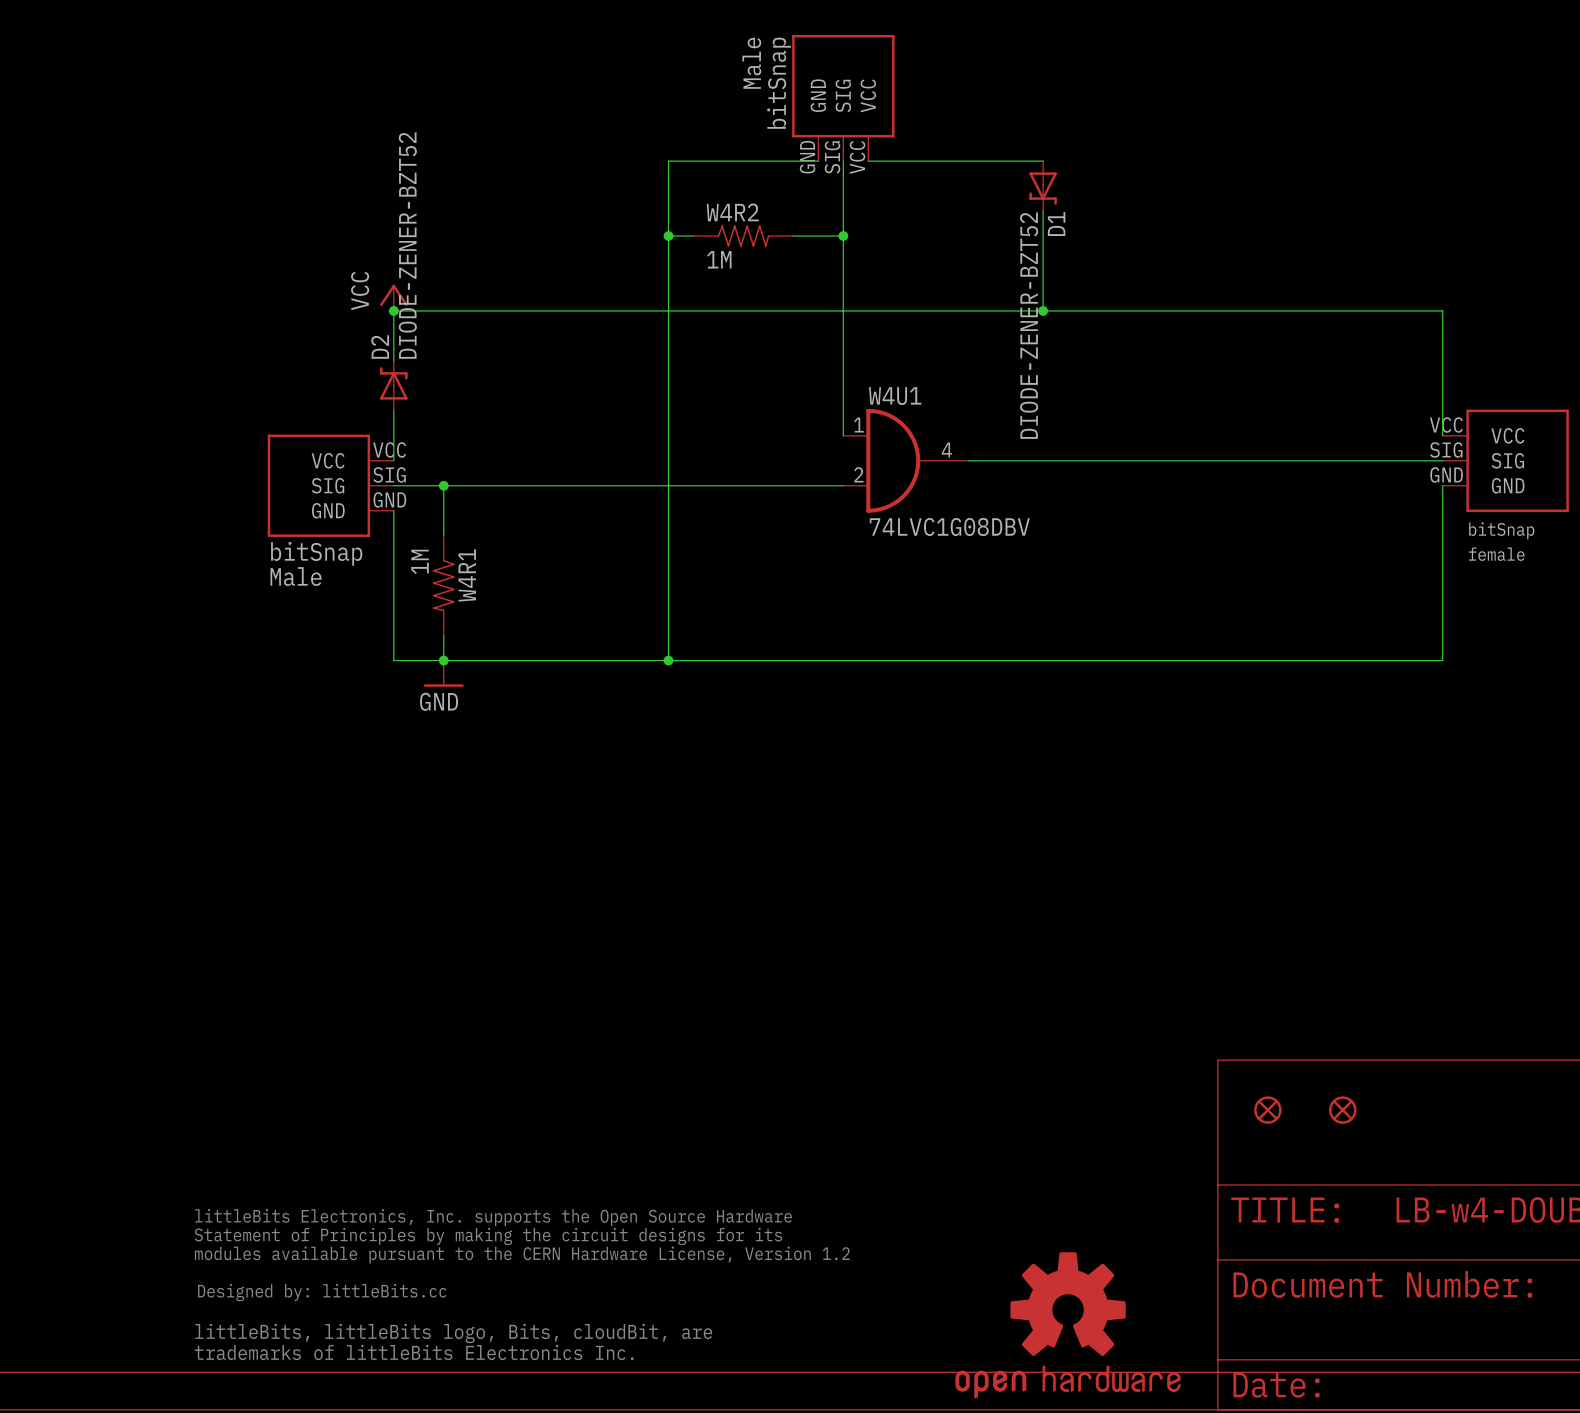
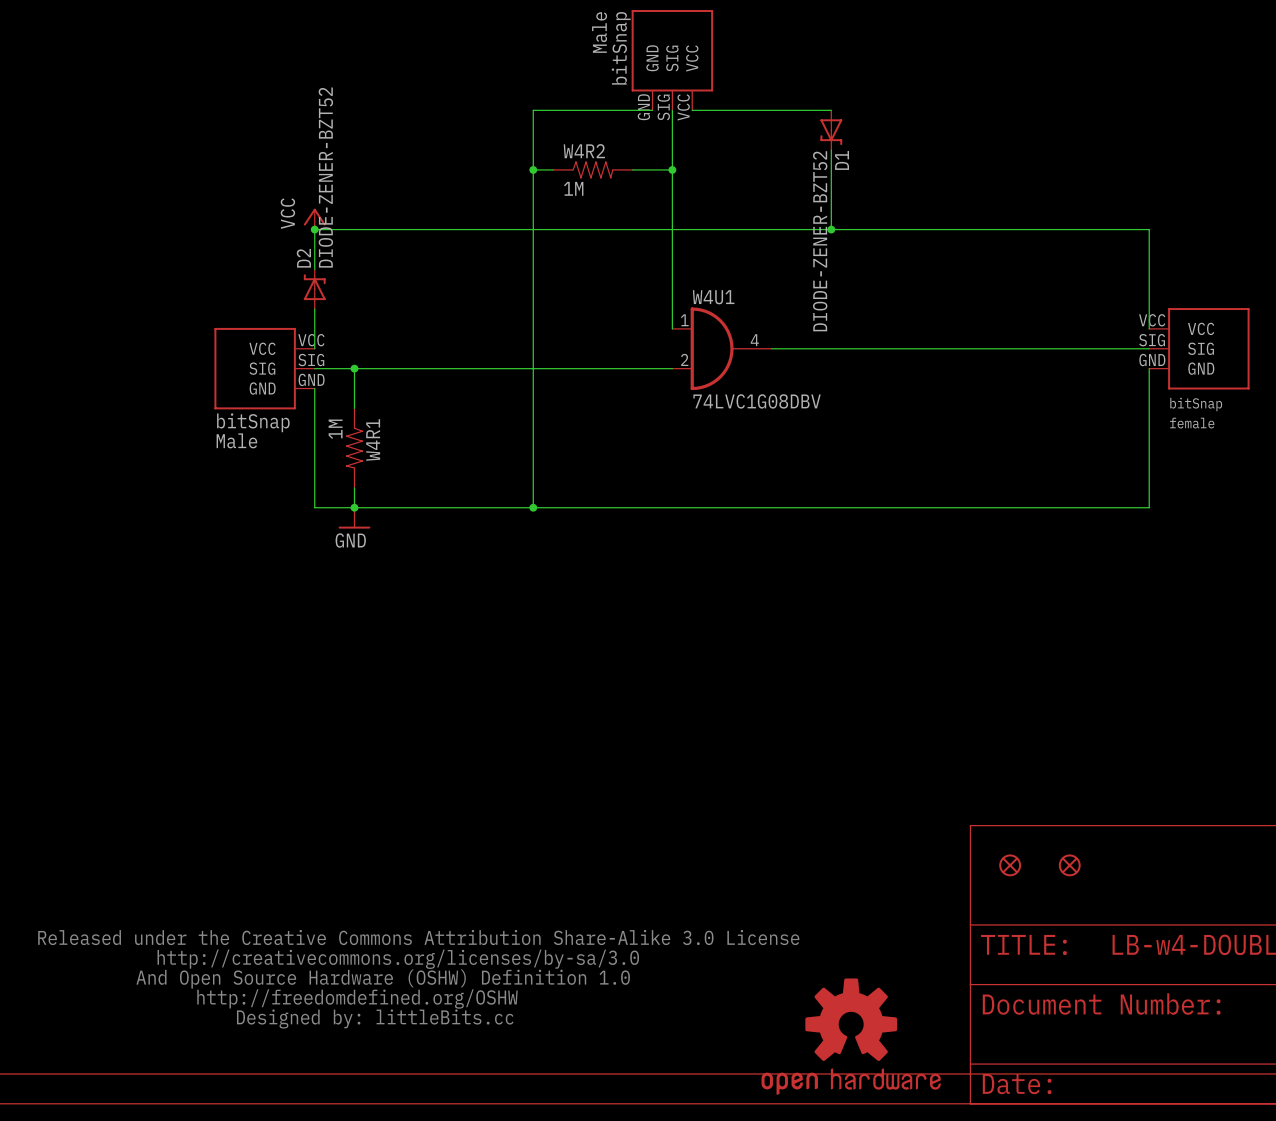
part: none -> (418, 979)
part: (522, 1284) -> none

